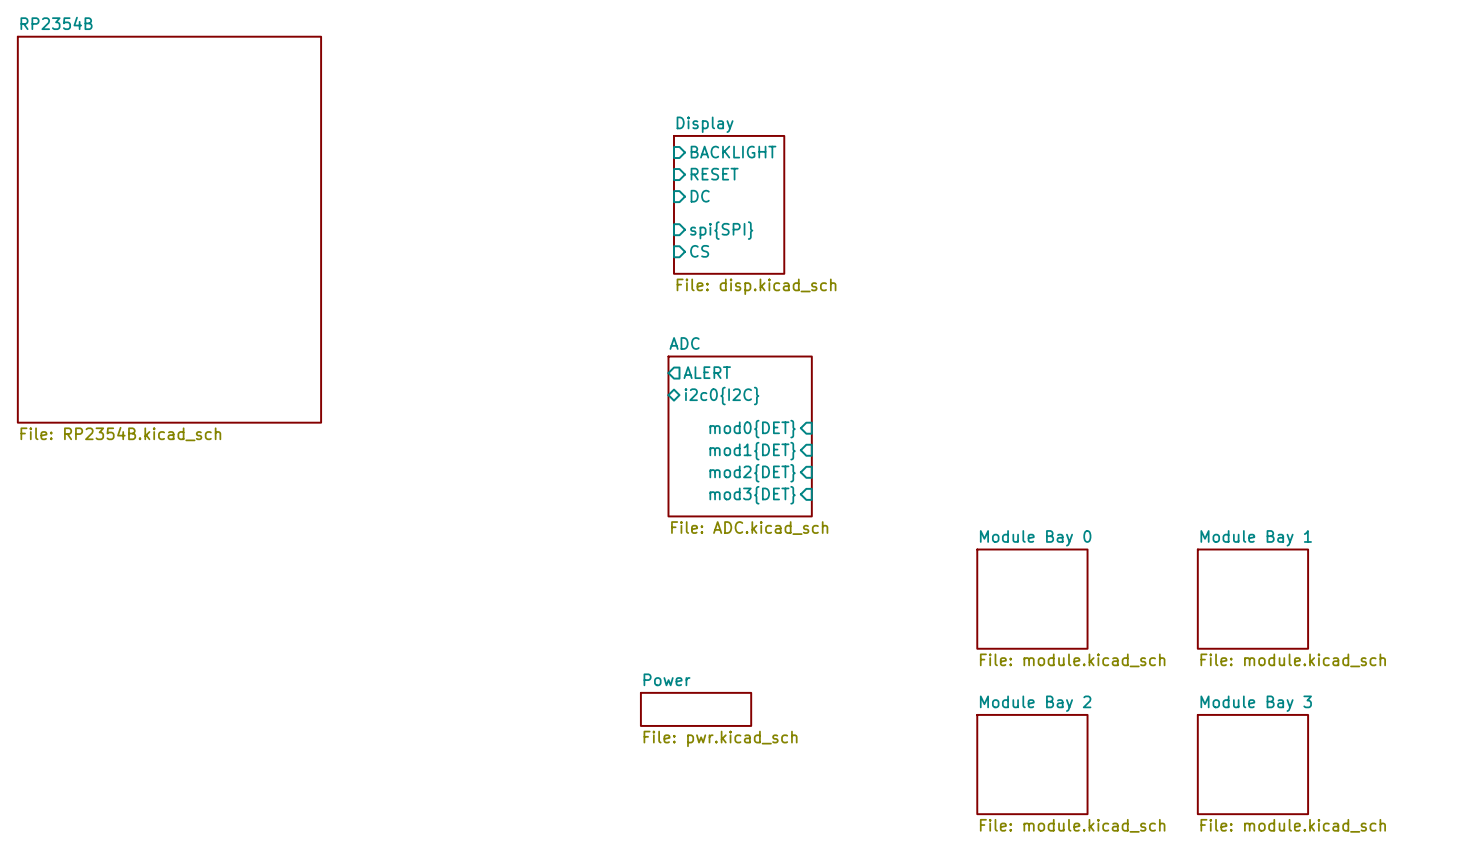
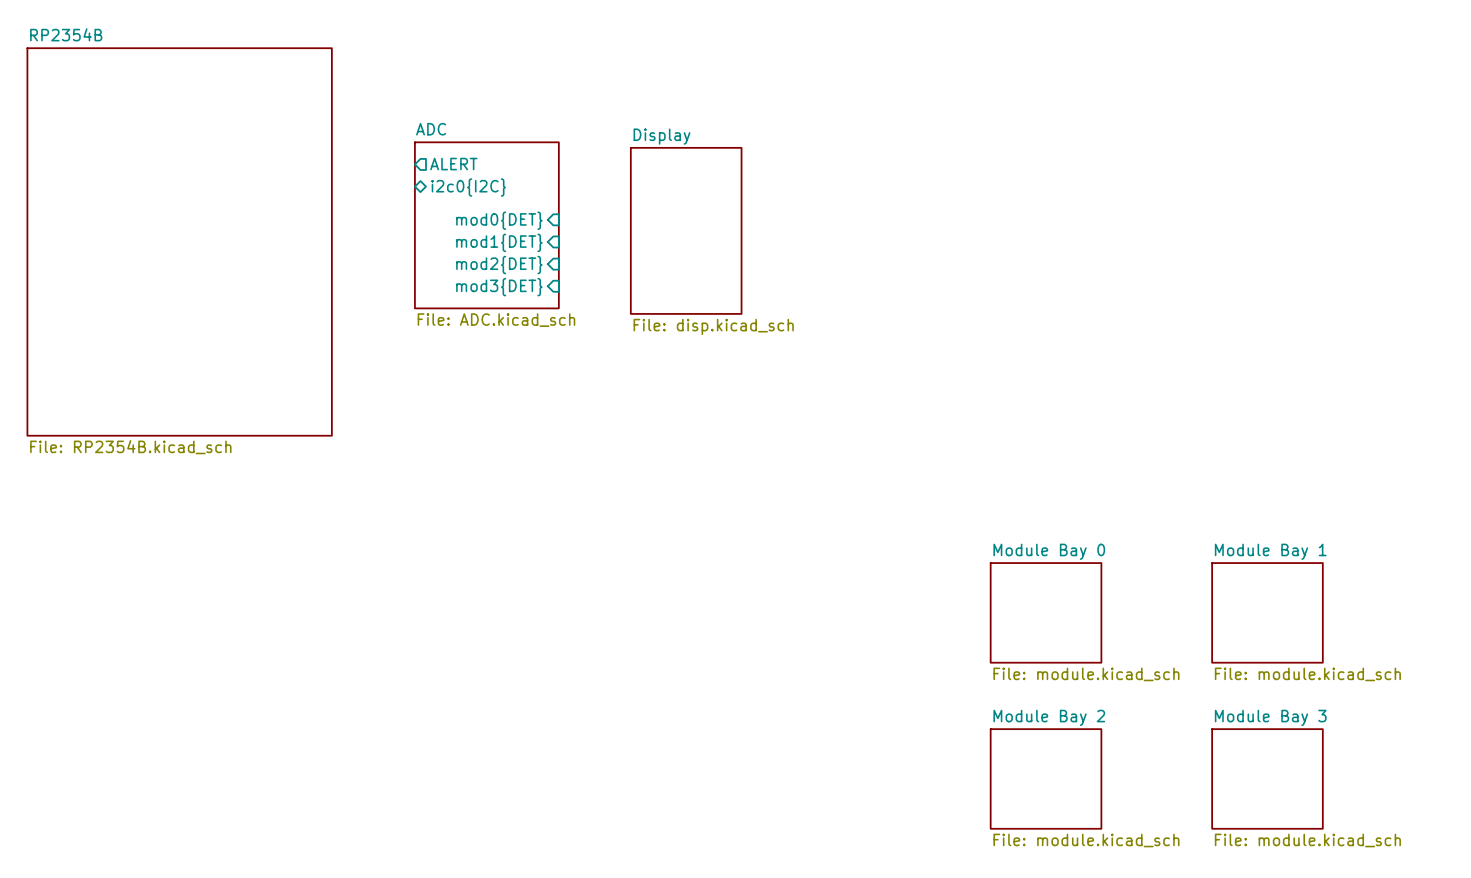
sheet pin: none -> ALERT (453, 164)
sheet pin: BACKLIGHT (733, 152) -> none
sheet pin: RESET (714, 174) -> none
sheet pin: none -> i2c0{I2C} (468, 187)
sheet pin: DC (700, 196) -> none
sheet Display: File: disp.kicad_sch (729, 204) -> none
sheet pin: none -> mod0{DET} (499, 220)
sheet ADC: none -> File: ADC.kicad_sch (486, 225)
sheet Display: none -> File: disp.kicad_sch (686, 230)
sheet pin: none -> mod1{DET} (499, 242)
sheet pin: spi{SPI} (721, 230) -> none
sheet pin: CS (699, 251) -> none
sheet pin: none -> mod2{DET} (499, 265)
sheet pin: none -> mod3{DET} (499, 287)
sheet pin: ALERT (707, 372) -> none
sheet pin: i2c0{I2C} (721, 396) -> none
sheet pin: mod0{DET} (752, 429) -> none
sheet ADC: File: ADC.kicad_sch (740, 436) -> none
sheet pin: mod1{DET} (752, 451) -> none
sheet pin: mod2{DET} (752, 473) -> none
sheet pin: mod3{DET} (752, 495) -> none
sheet Power: File: pwr.kicad_sch (696, 709) -> none

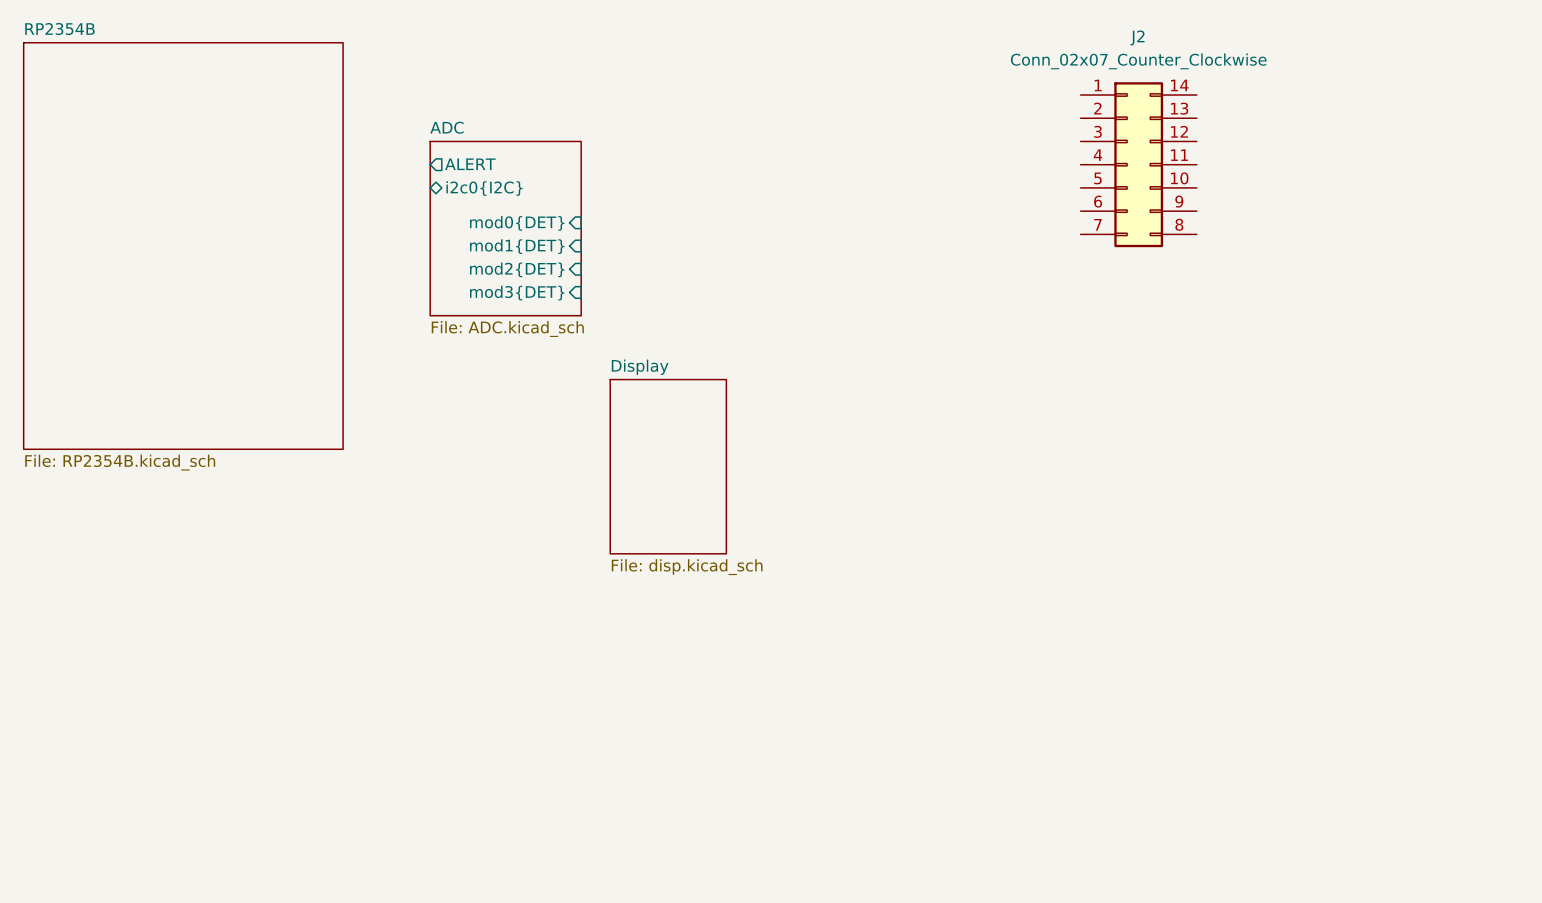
J2: none -> Conn_02x07_Counter_Clockwise (1138, 164)
sheet Display: File: disp.kicad_sch (686, 230) -> none
sheet Display: none -> File: disp.kicad_sch (668, 466)
sheet Module Bay 0: File: module.kicad_sch (1046, 612) -> none
sheet Module Bay 1: File: module.kicad_sch (1267, 612) -> none
sheet Module Bay 2: File: module.kicad_sch (1046, 778) -> none
sheet Module Bay 3: File: module.kicad_sch (1267, 778) -> none

